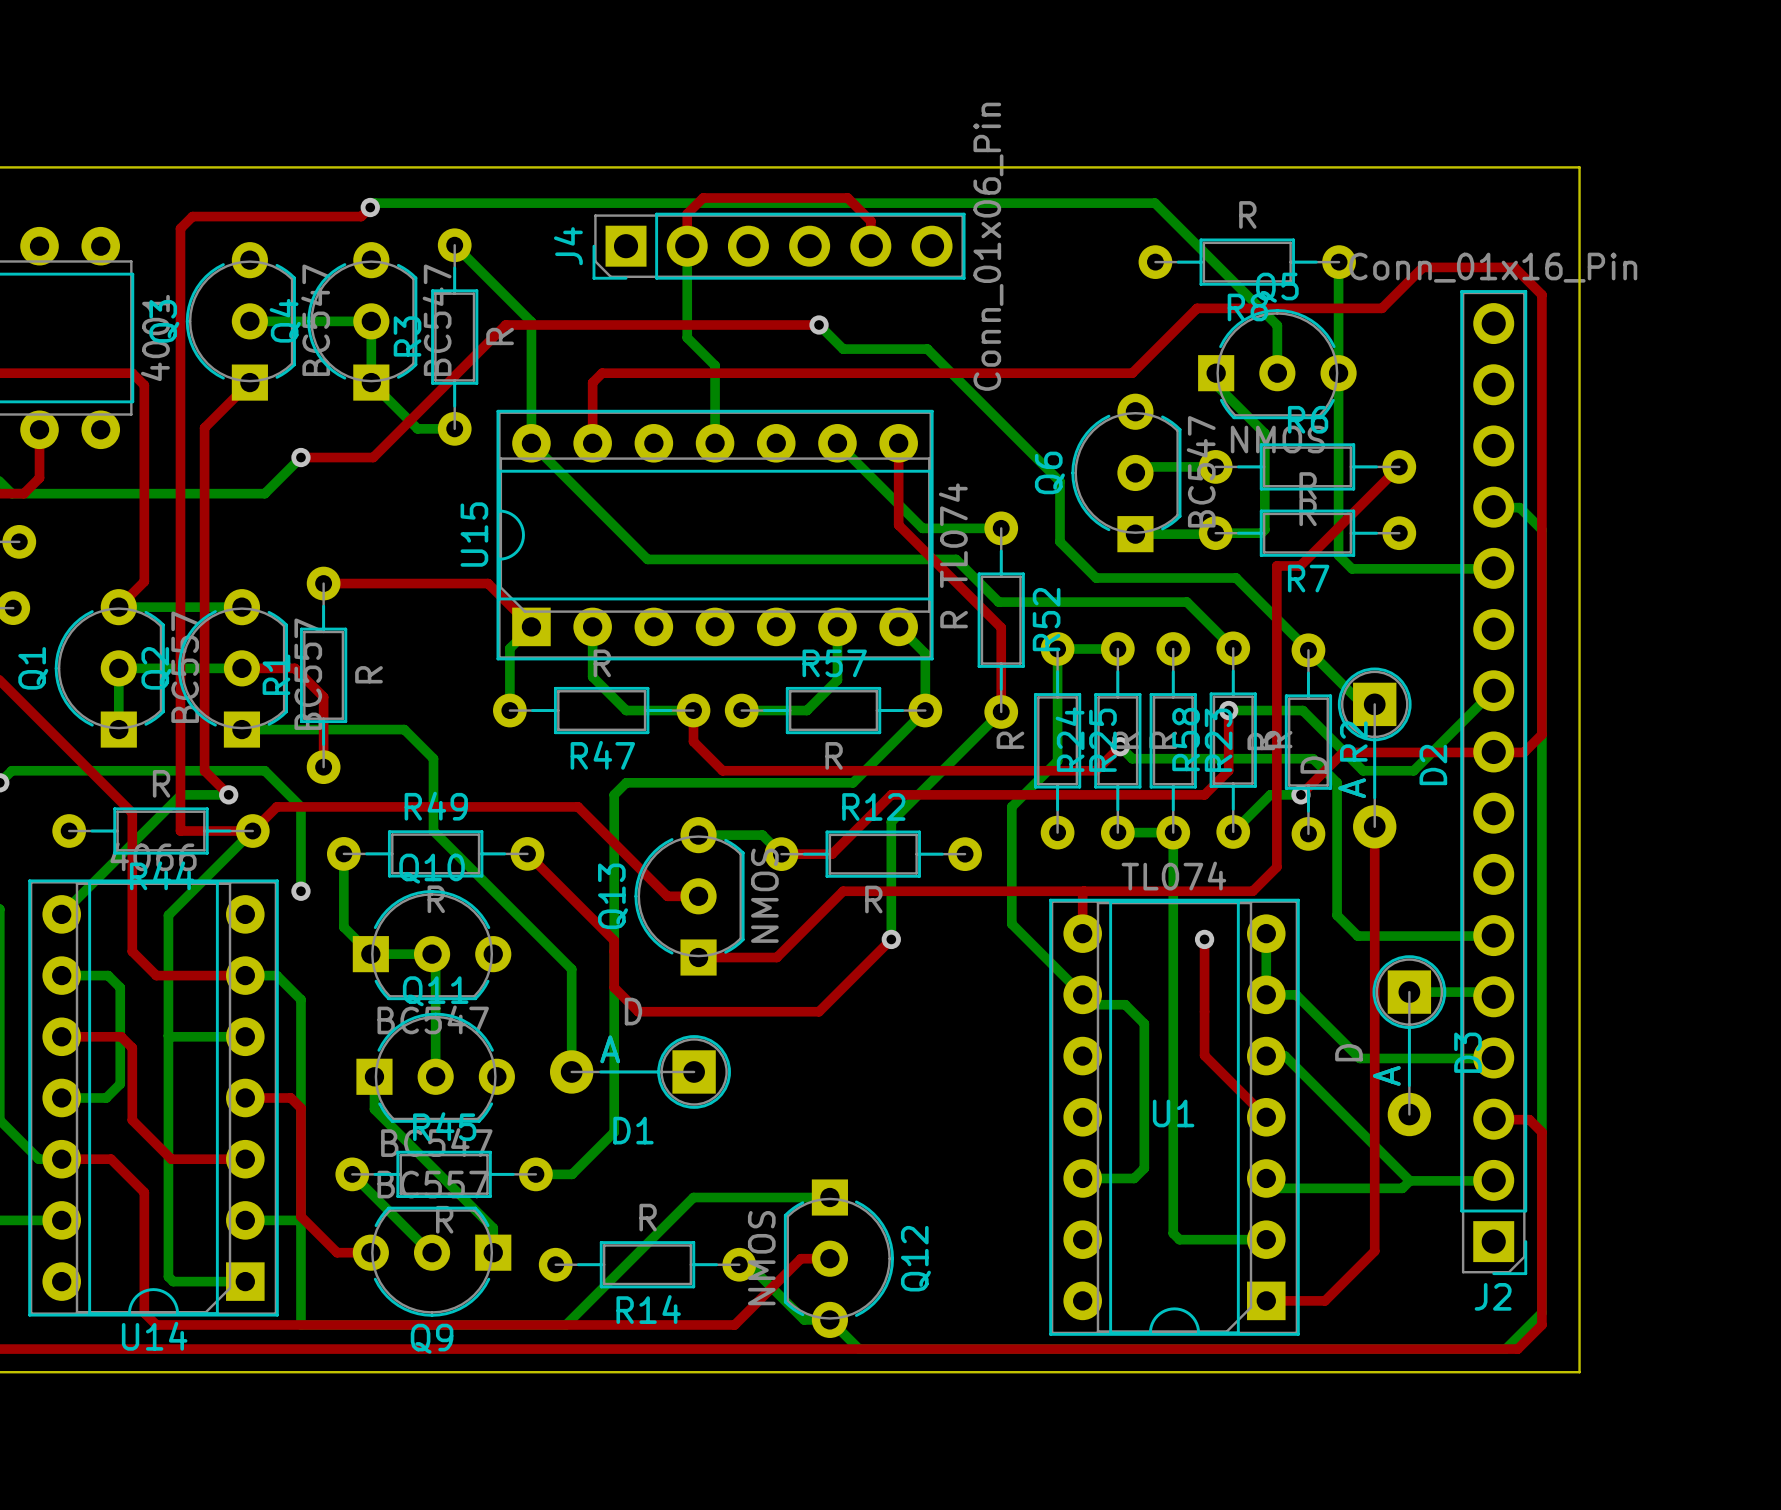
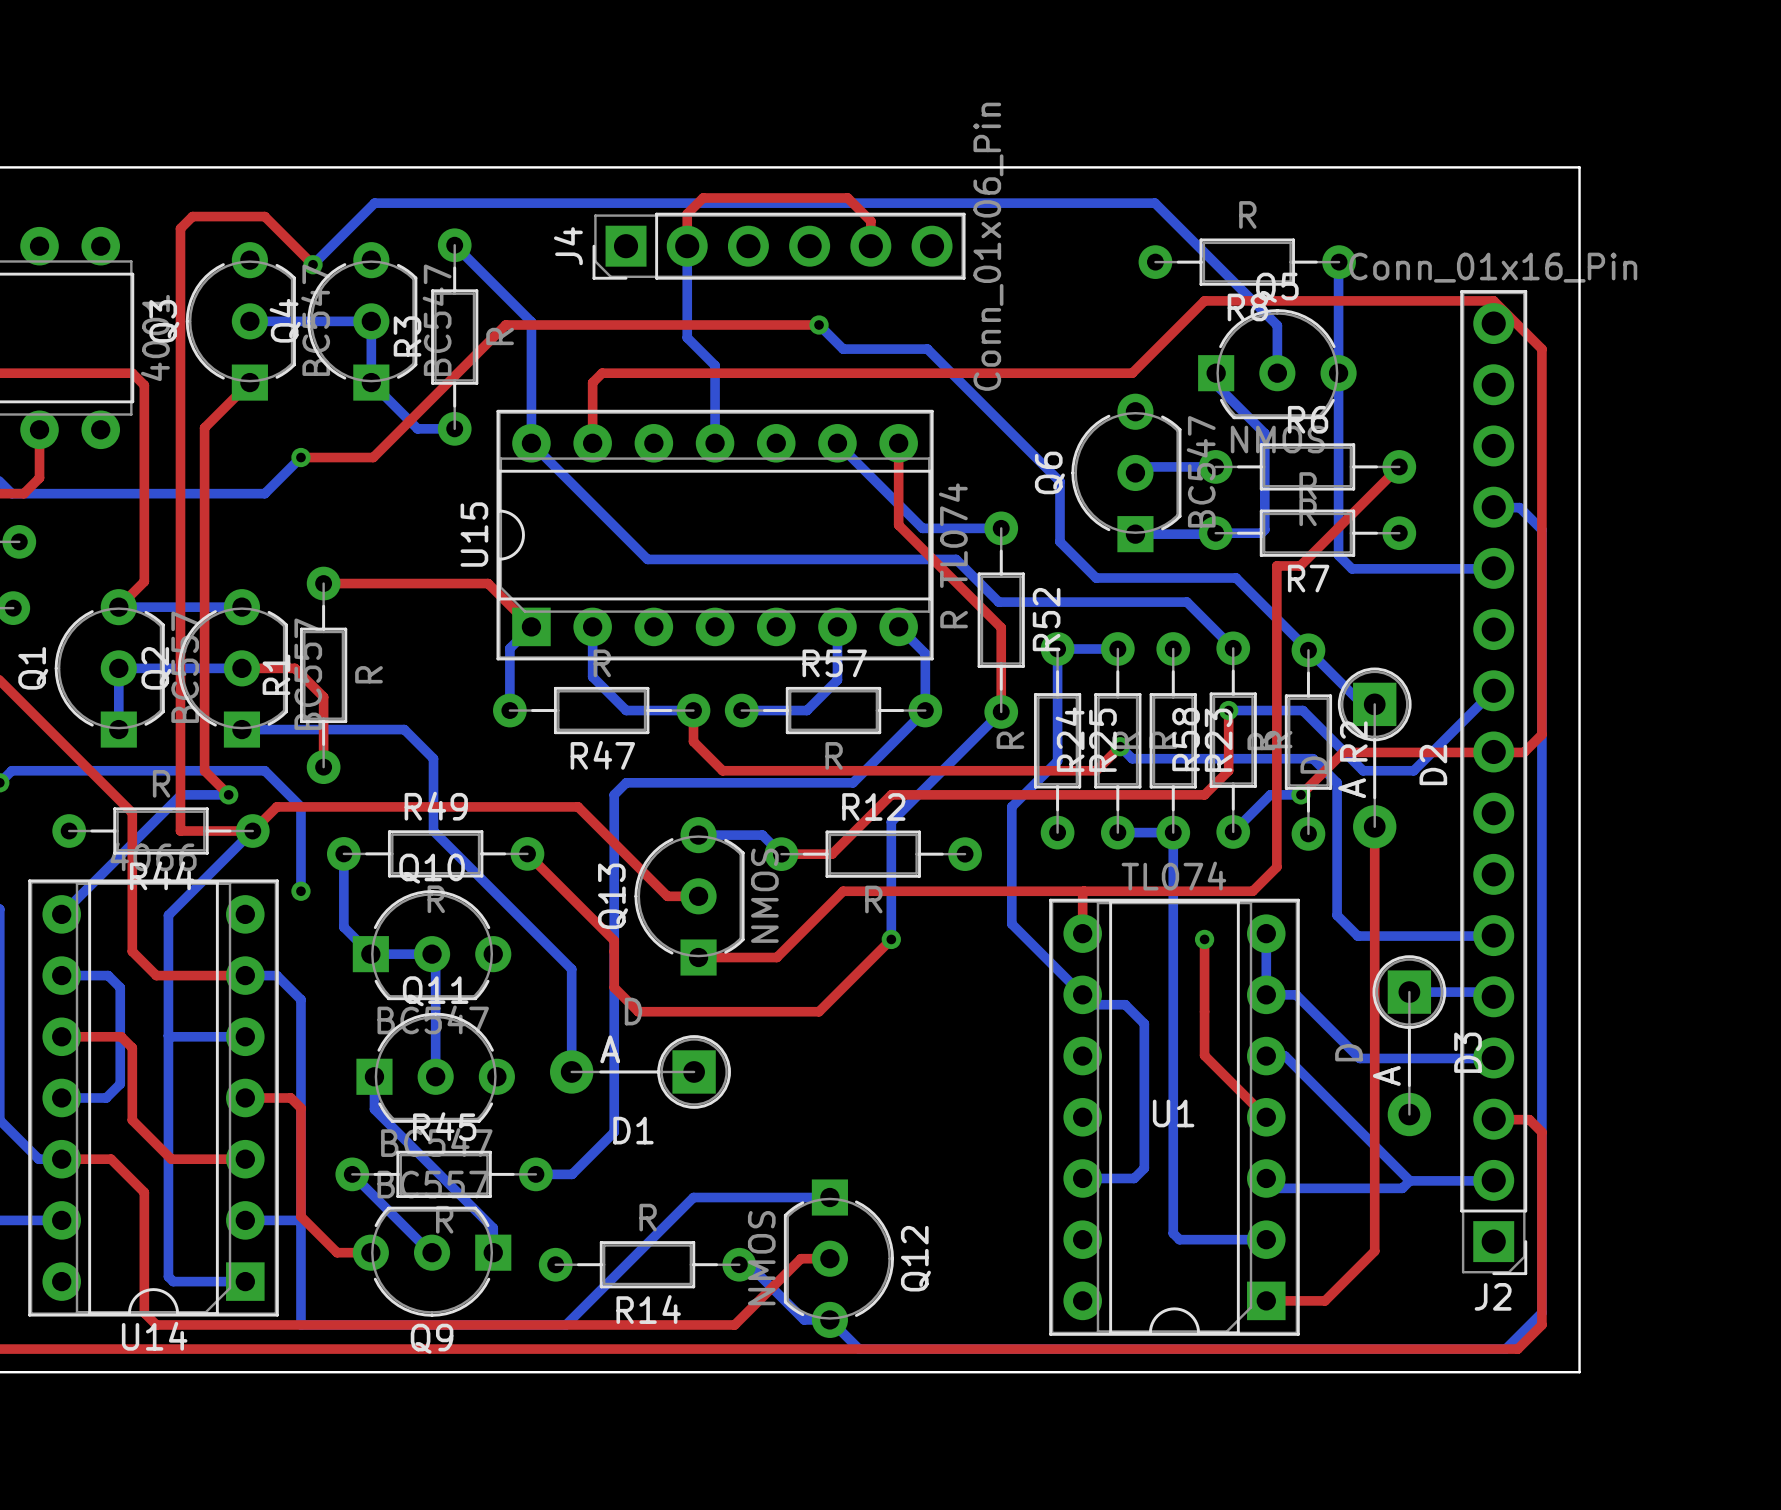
bottom track: none -> (370, 207) (313, 264)
top track: (370, 207) (361, 216) (264, 216) -> (313, 264) (264, 216)
via position: (370, 207) -> (313, 264)
top track: (1197, 308) (1381, 308) (1422, 267) (1514, 267) (1541, 294) (1541, 349) -> (1197, 308) (1204, 300) (1493, 300) (1541, 349)

